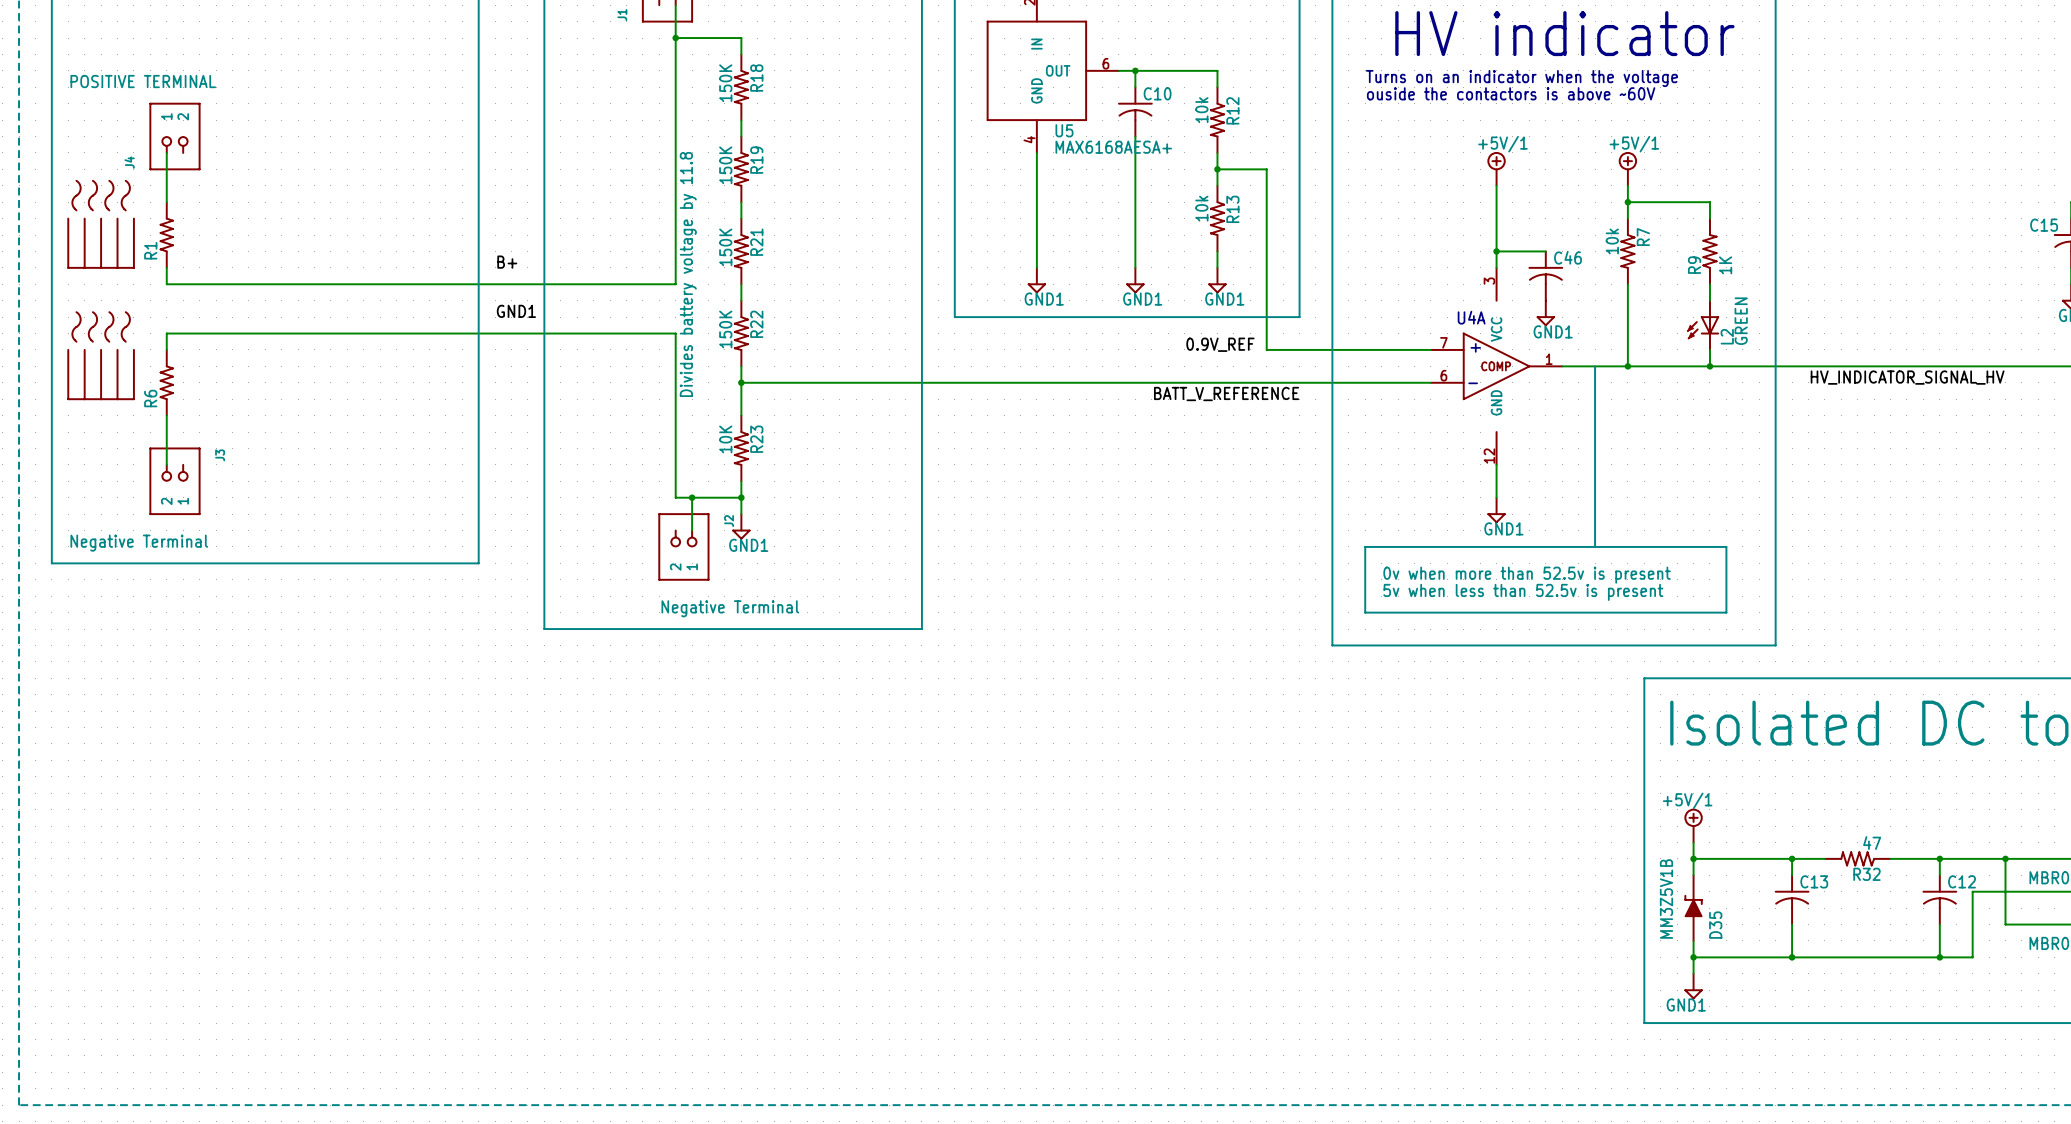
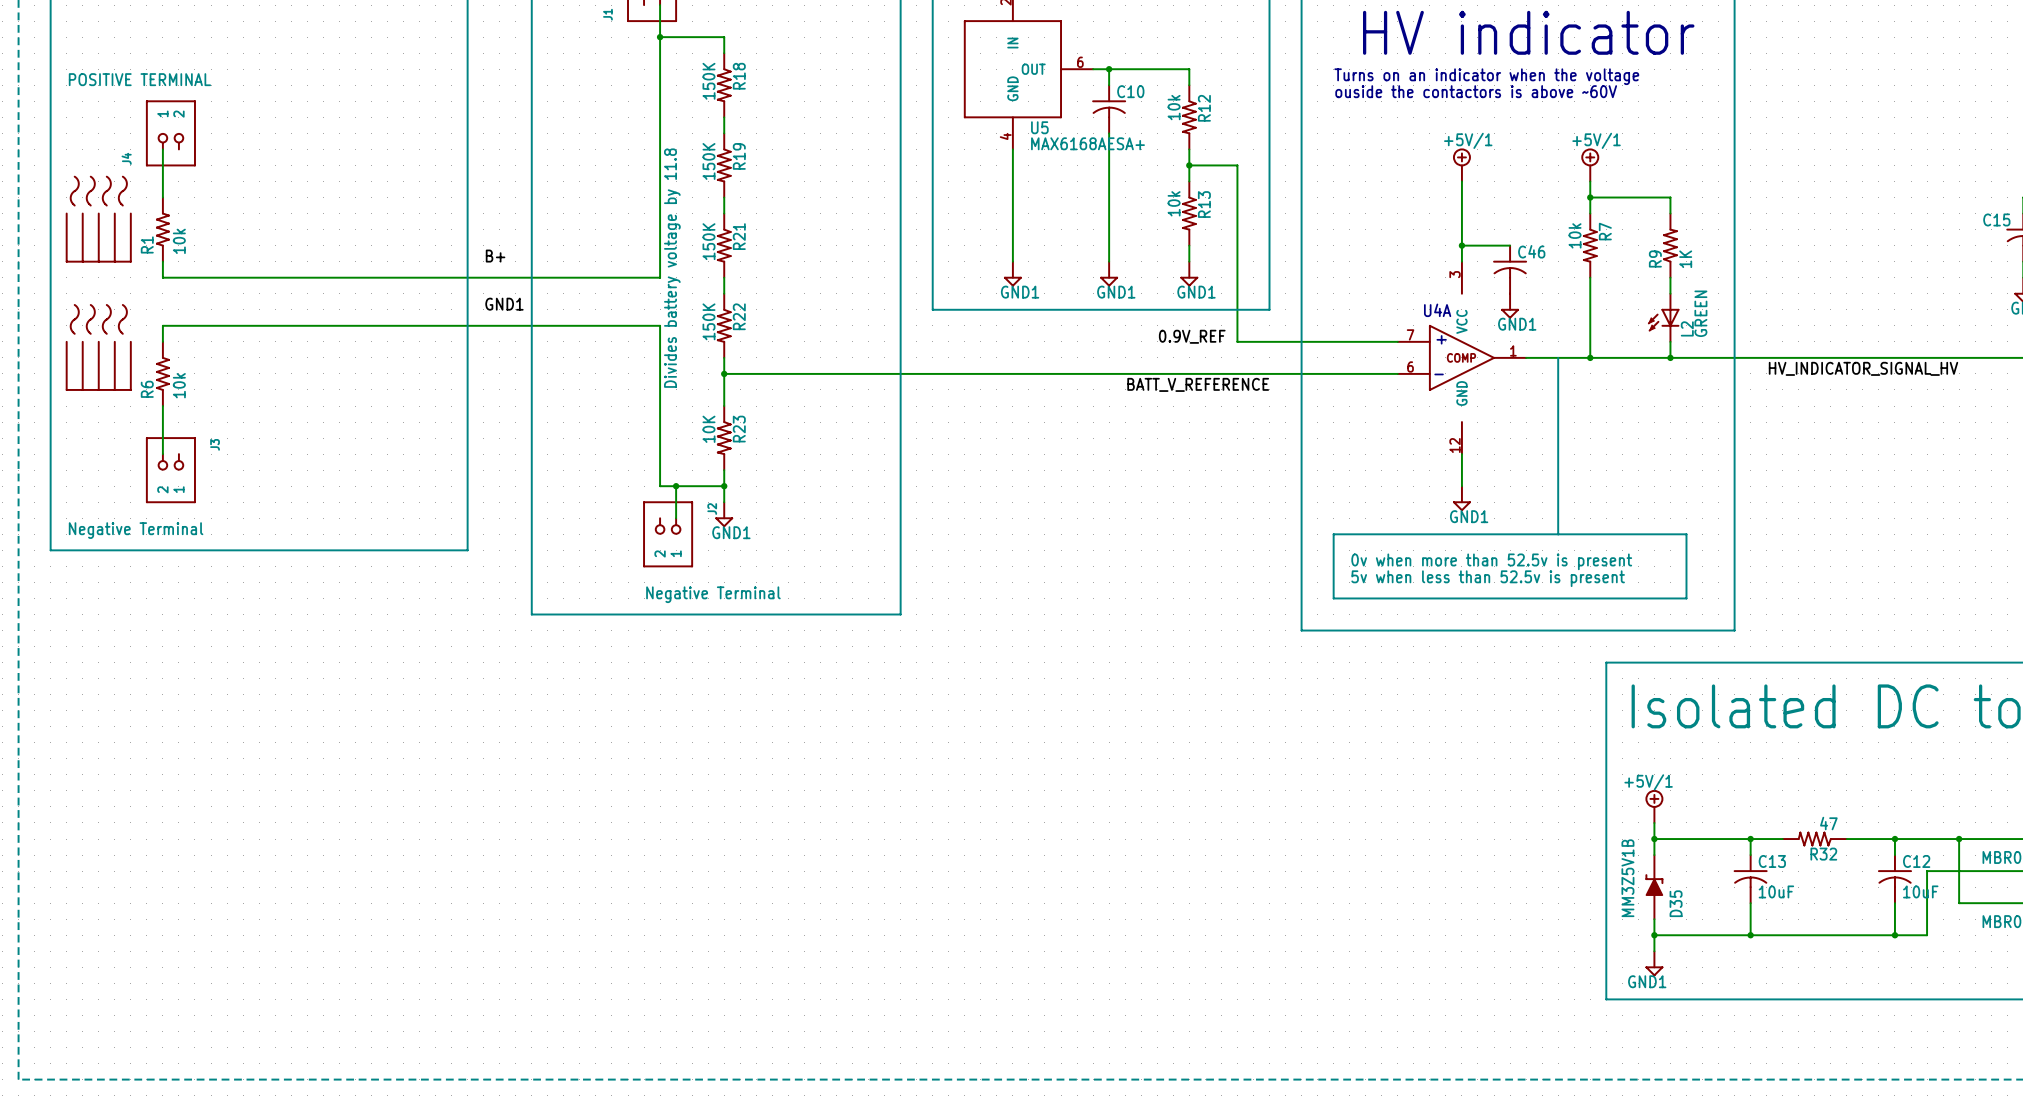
R1 value: none -> 10k (179, 241)
R6 value: none -> 10k (179, 385)
C13 value: none -> 10uF (1776, 891)
C12 value: none -> 10uF (1920, 891)

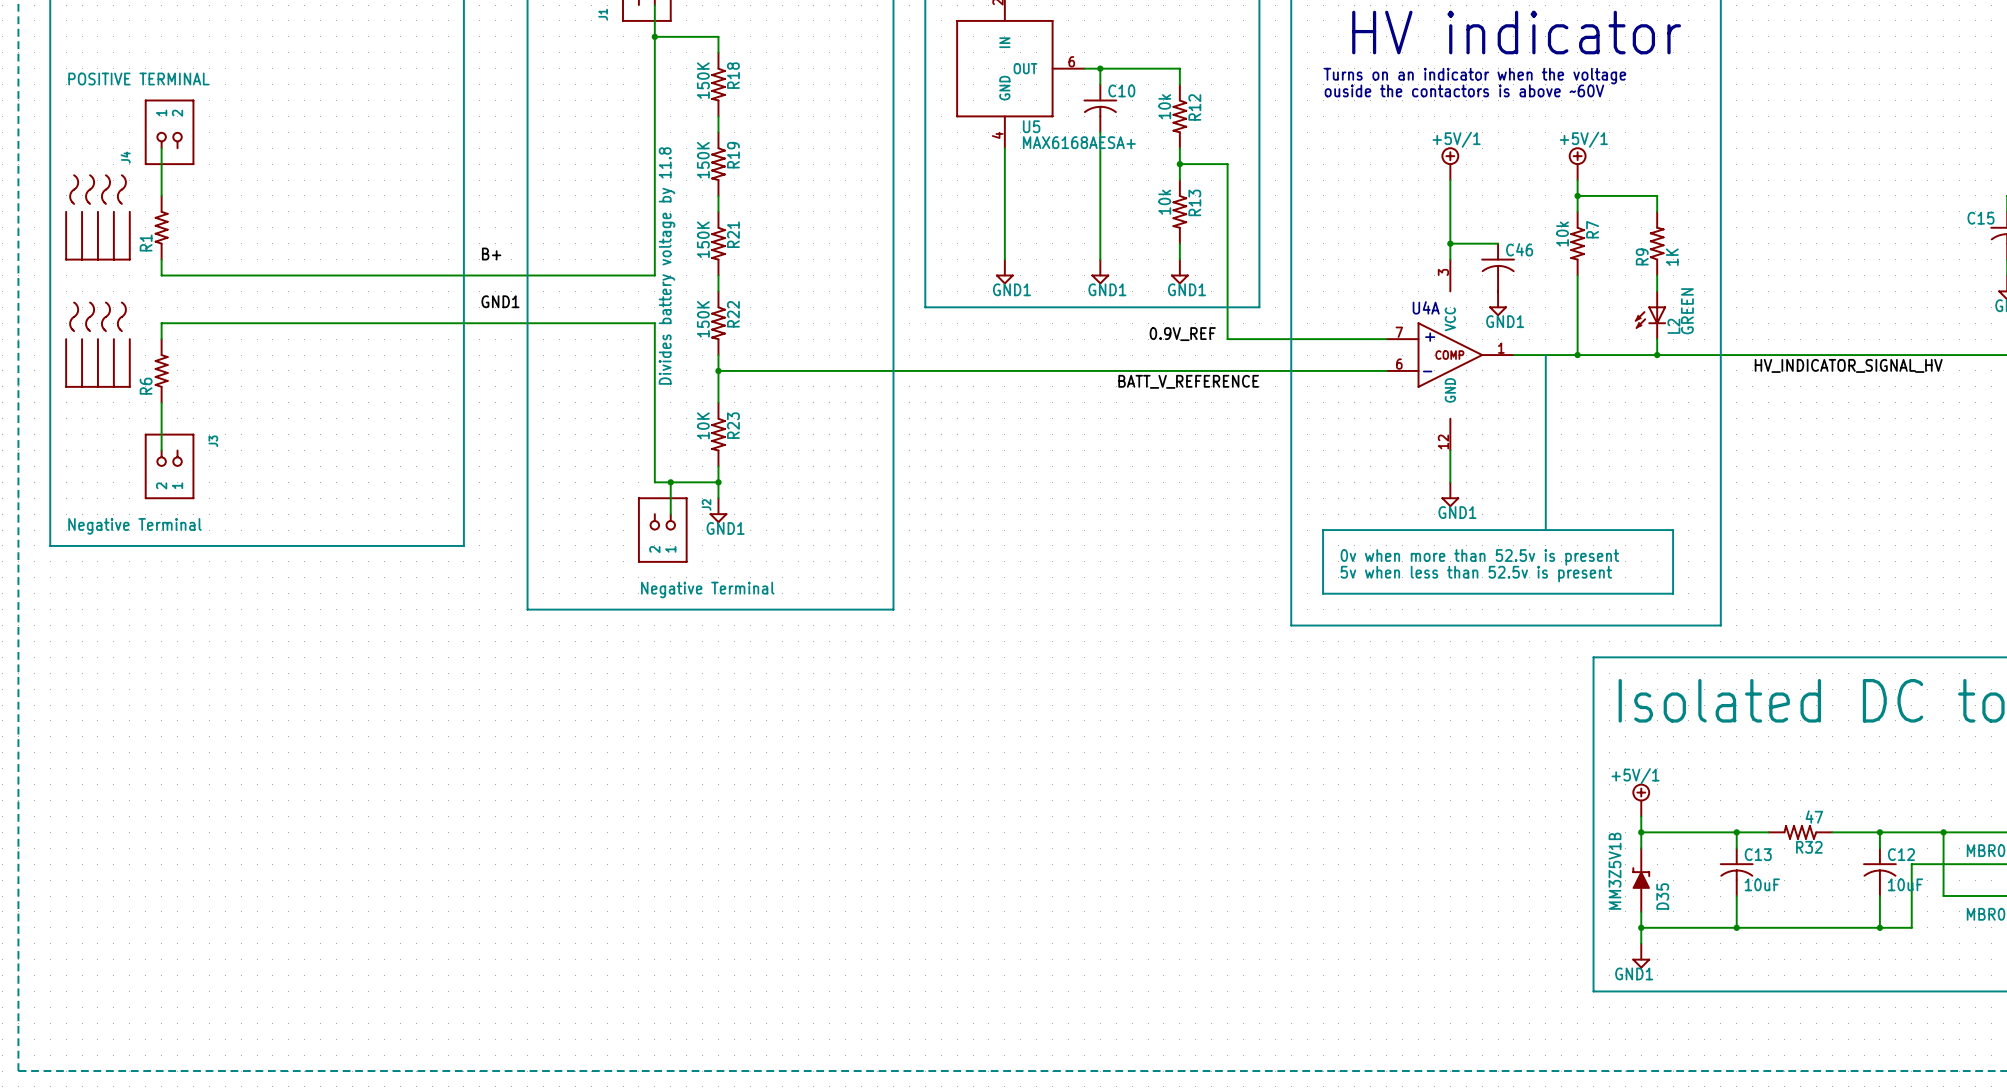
R1 value: 10k (179, 241) -> none
R6 value: 10k (179, 385) -> none

